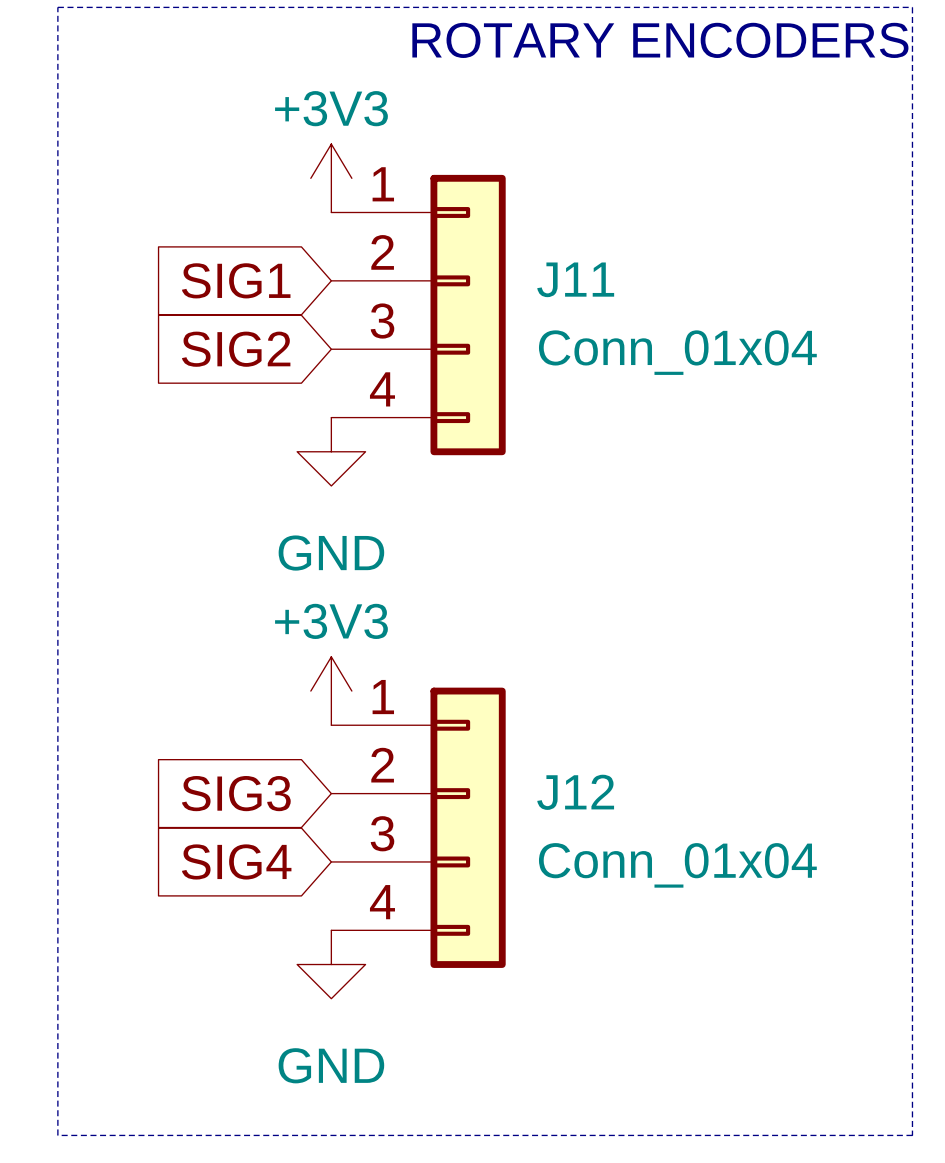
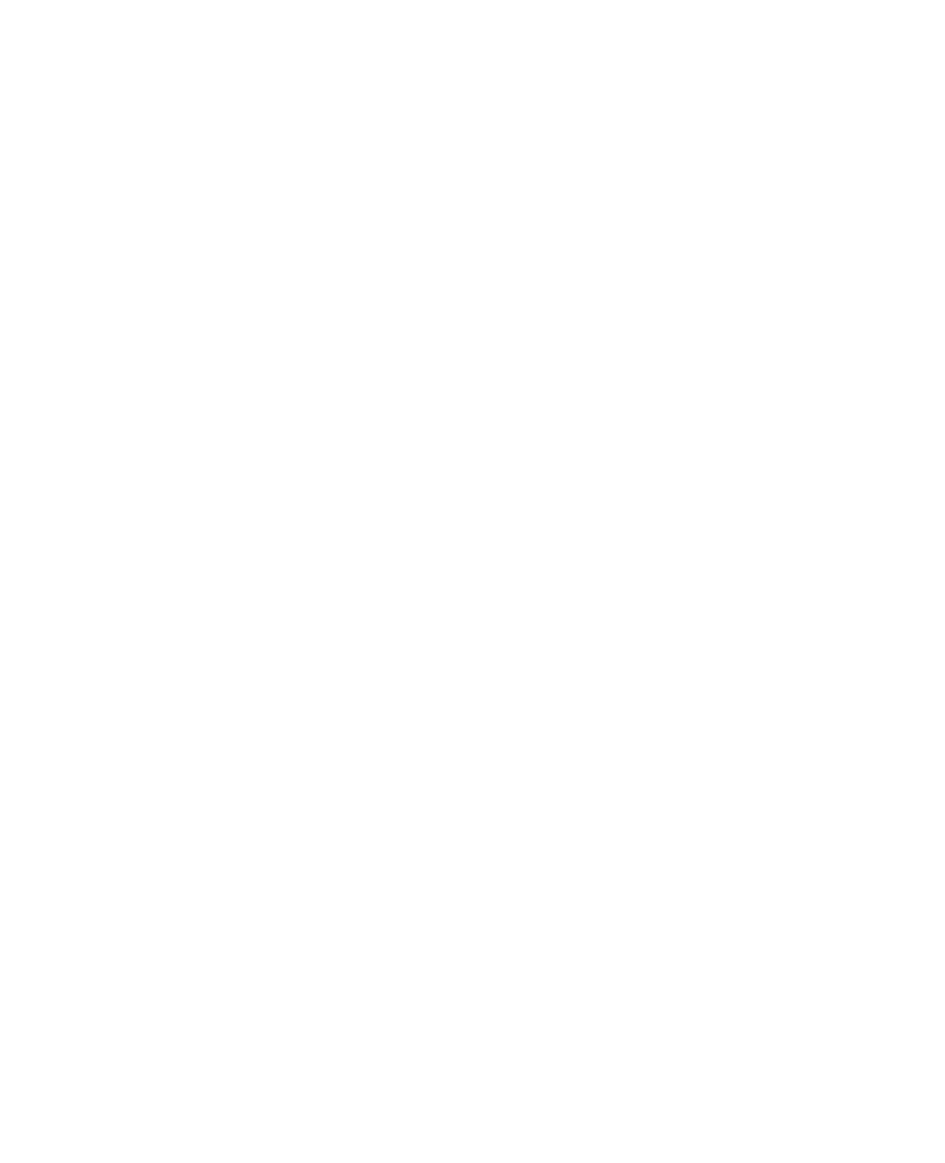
line: (57, 7) (912, 7) (912, 1135) (57, 1135) (57, 7) -> none
text: ROTARY ENCODERS (660, 40) -> none
power symbol: +3V3 (331, 178) -> none
global label: SIG1 (236, 280) -> none
J11: Conn_01x04 (418, 315) -> none
global label: SIG2 (236, 349) -> none
power symbol: GND (331, 451) -> none
power symbol: +3V3 (331, 691) -> none
global label: SIG3 (236, 793) -> none
J12: Conn_01x04 (418, 827) -> none
global label: SIG4 (236, 861) -> none
power symbol: GND (331, 964) -> none

